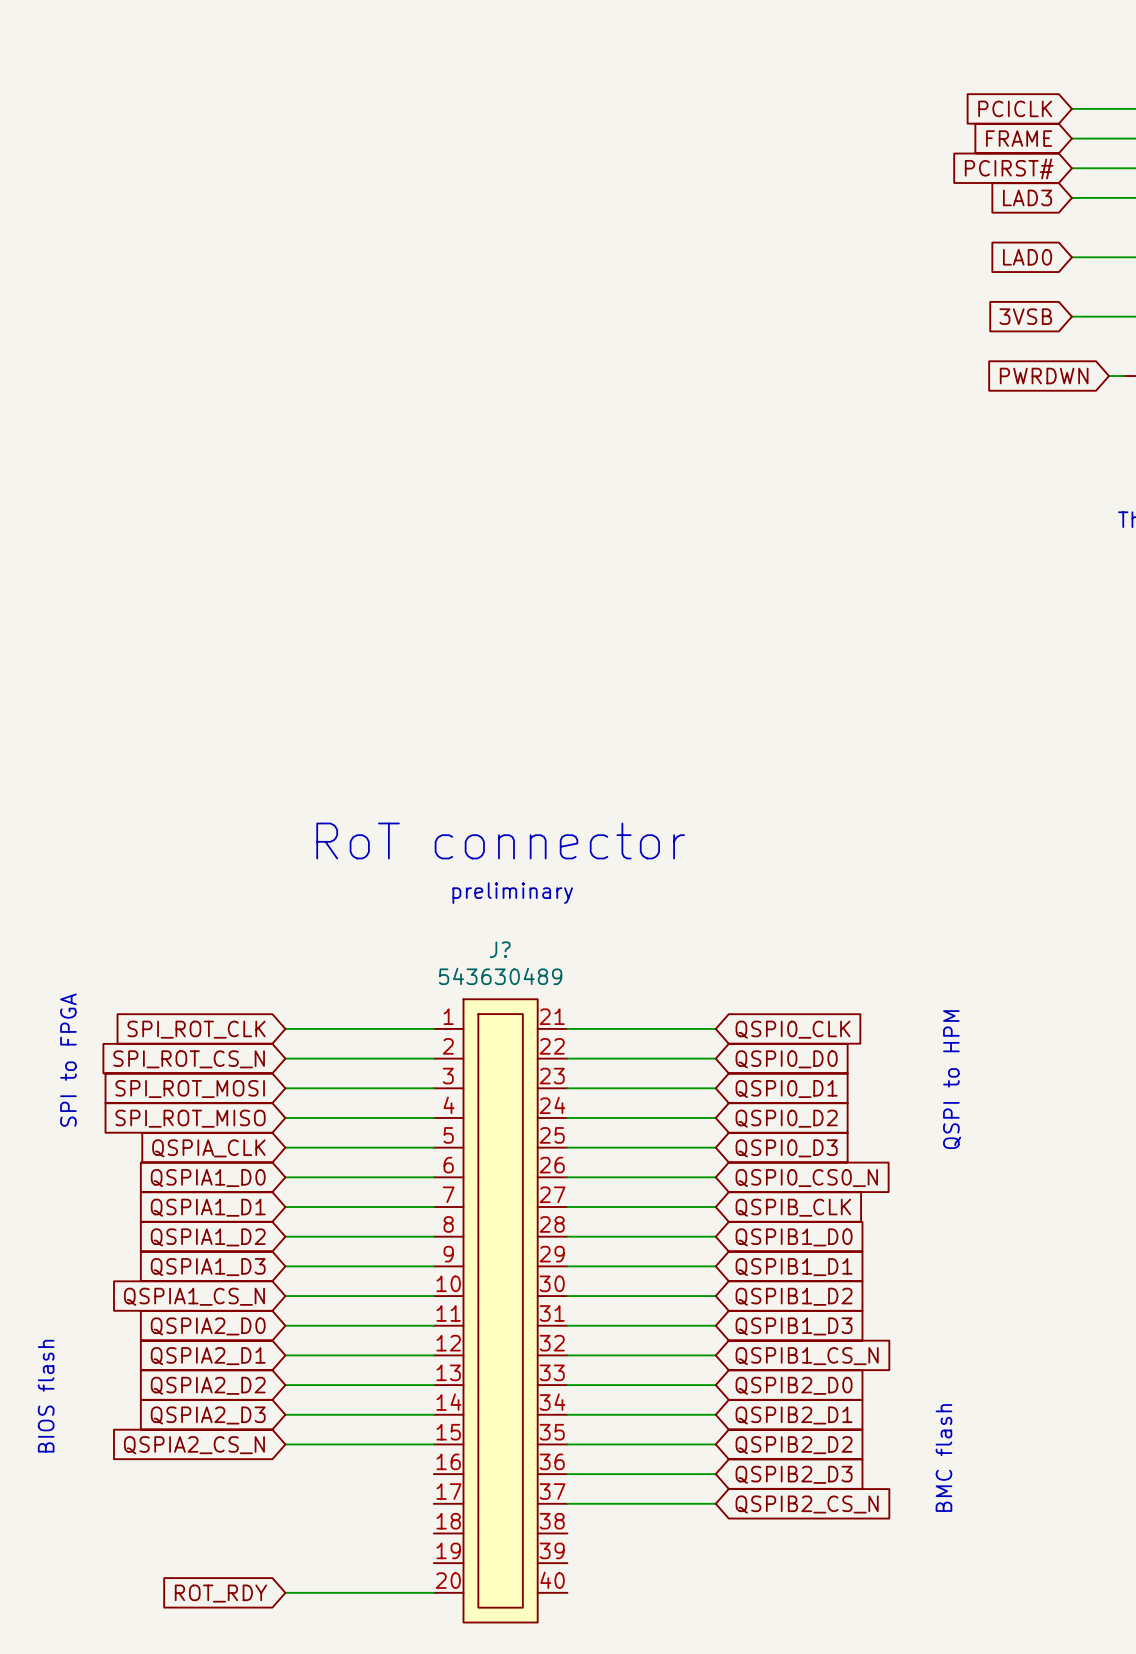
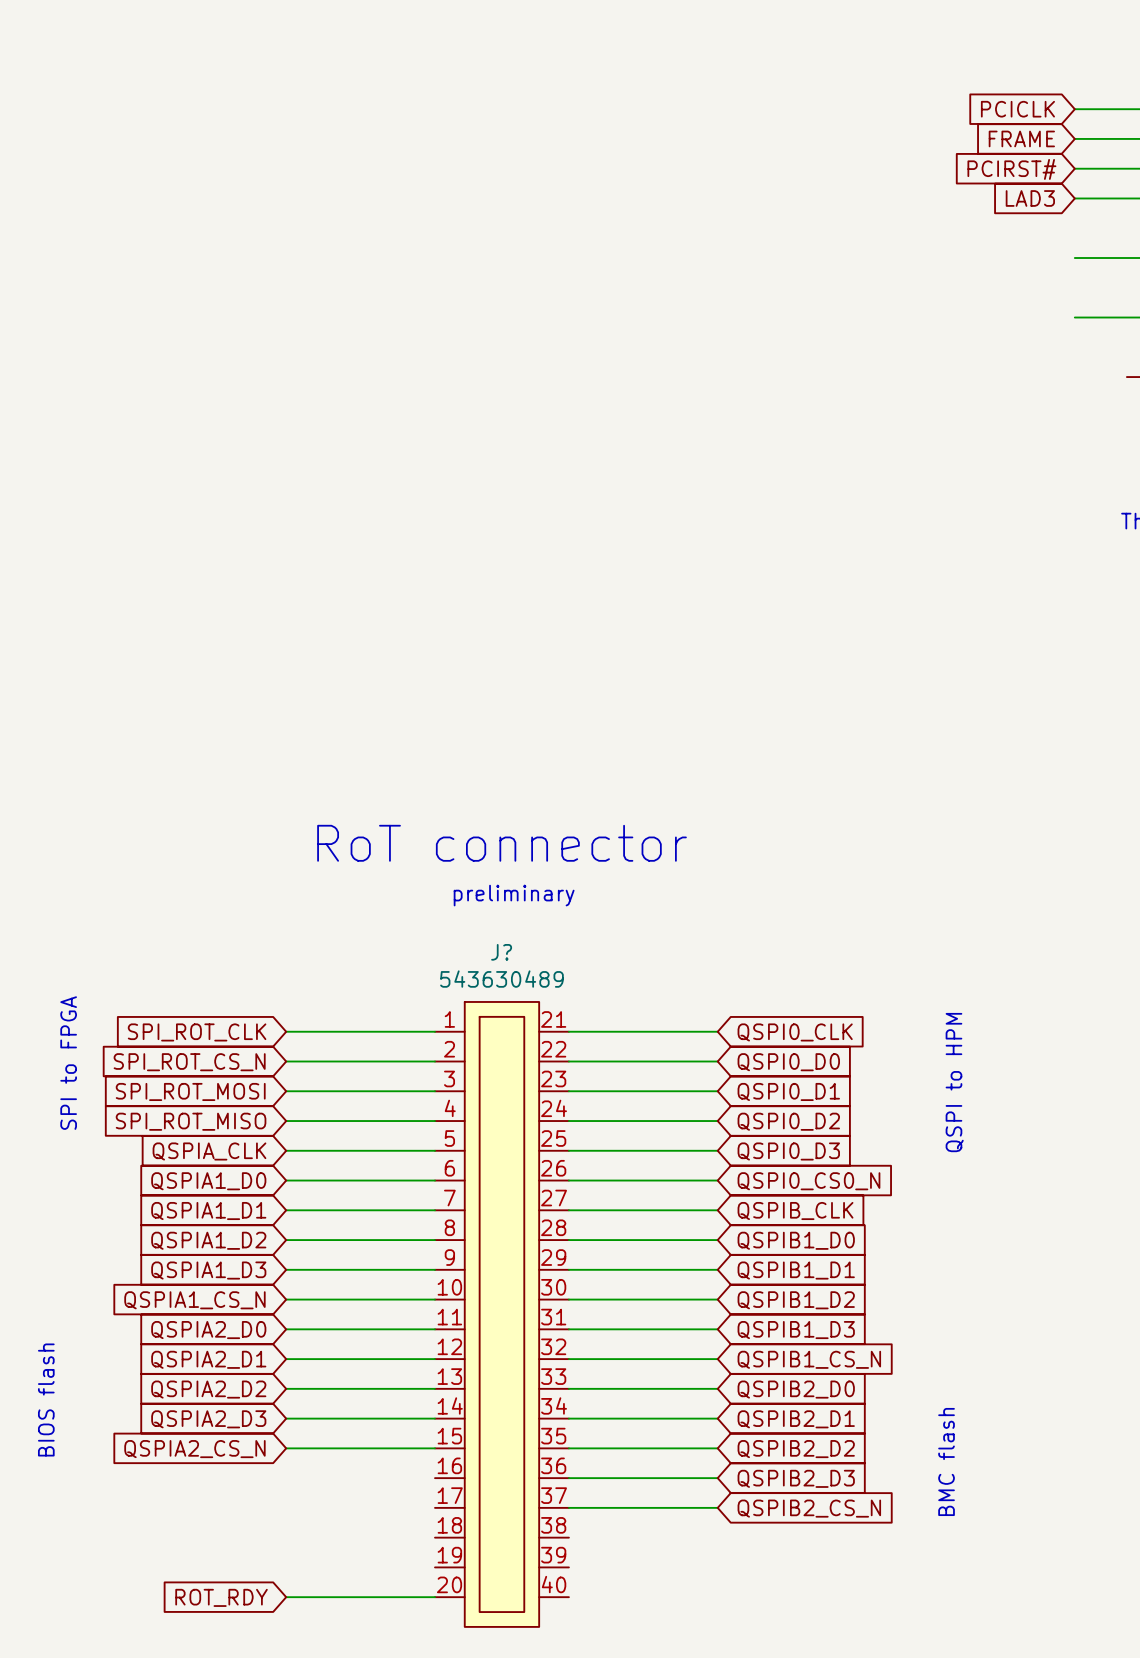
global label: LAD0 (1027, 257) -> none
global label: 3VSB (1025, 316) -> none
global label: PWRDWN (1044, 376) -> none
wire: (1109, 376) (1123, 376) -> none

